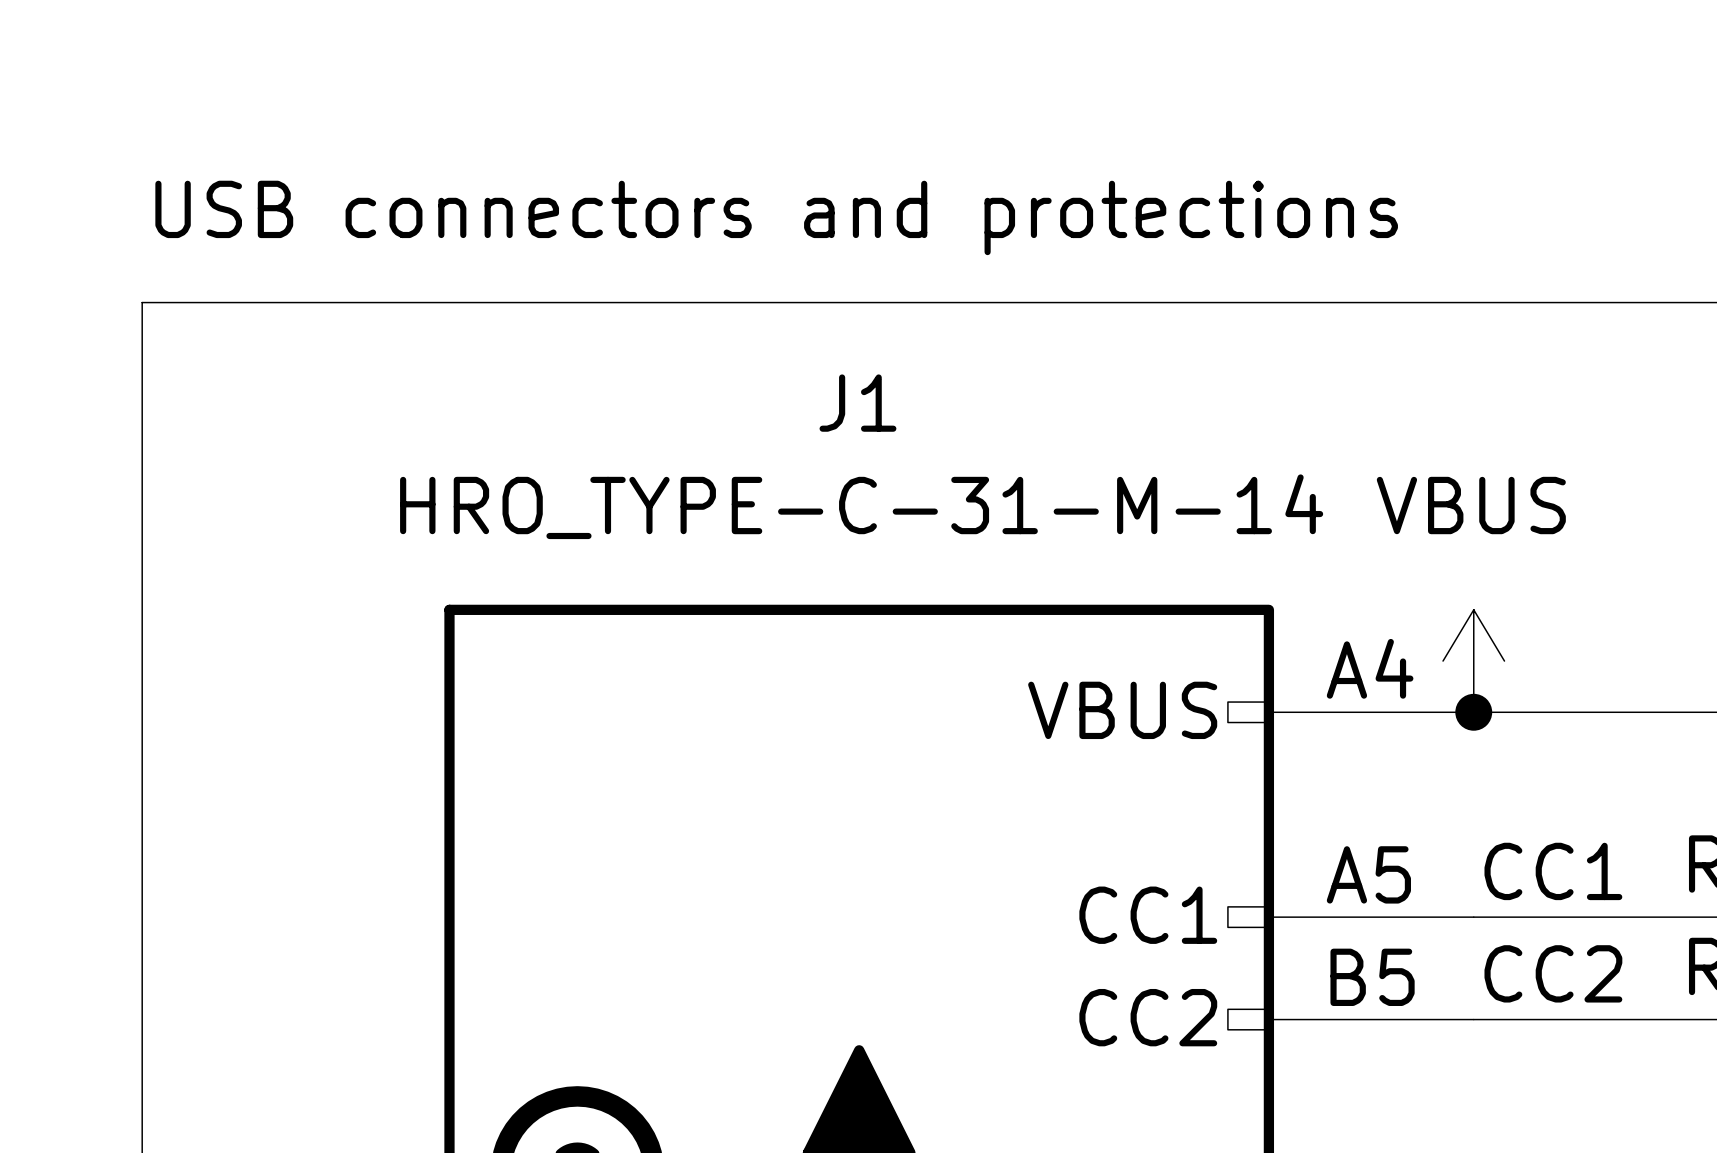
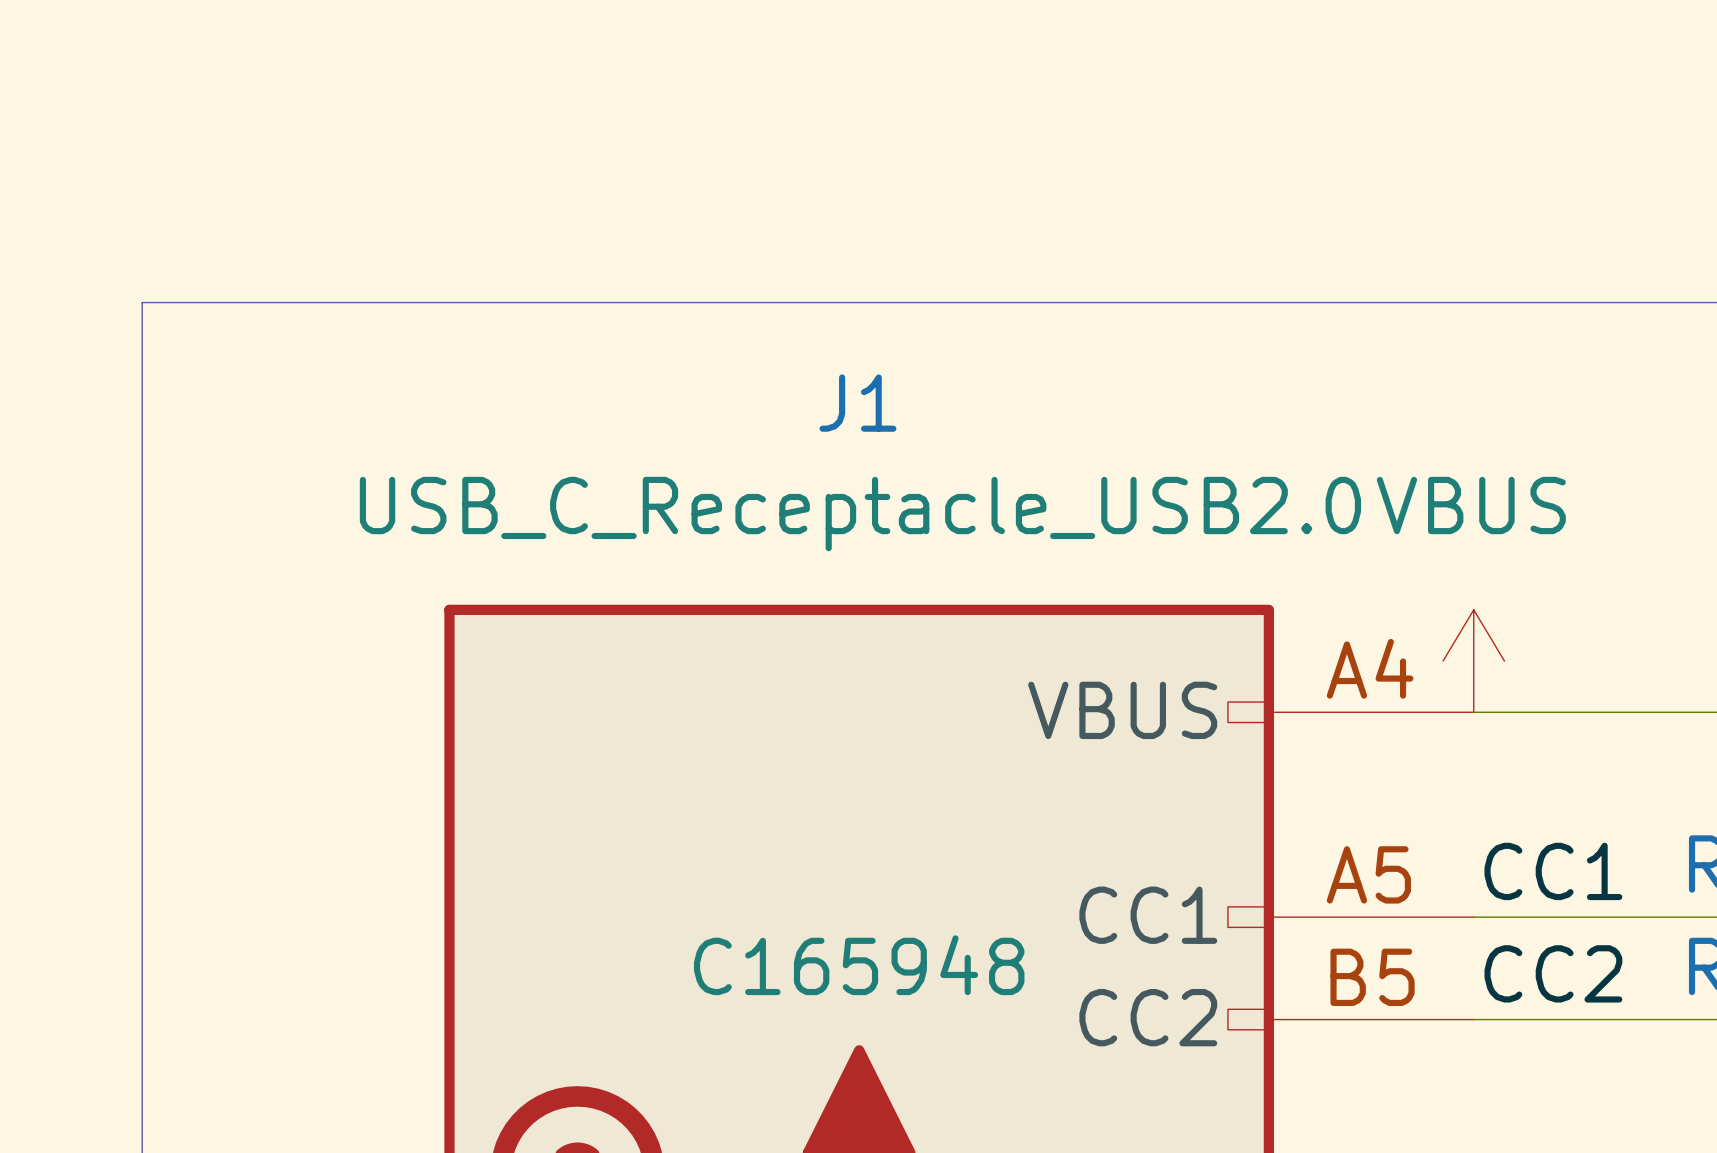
text: USB connectors and protections (776, 217) -> none
J1 value: HRO_TYPE-C-31-M-14 (861, 506) -> USB_C_Receptacle_USB2.0 (860, 514)
junction: (1473, 712) -> none
J1 text: none -> C165948 (859, 965)

